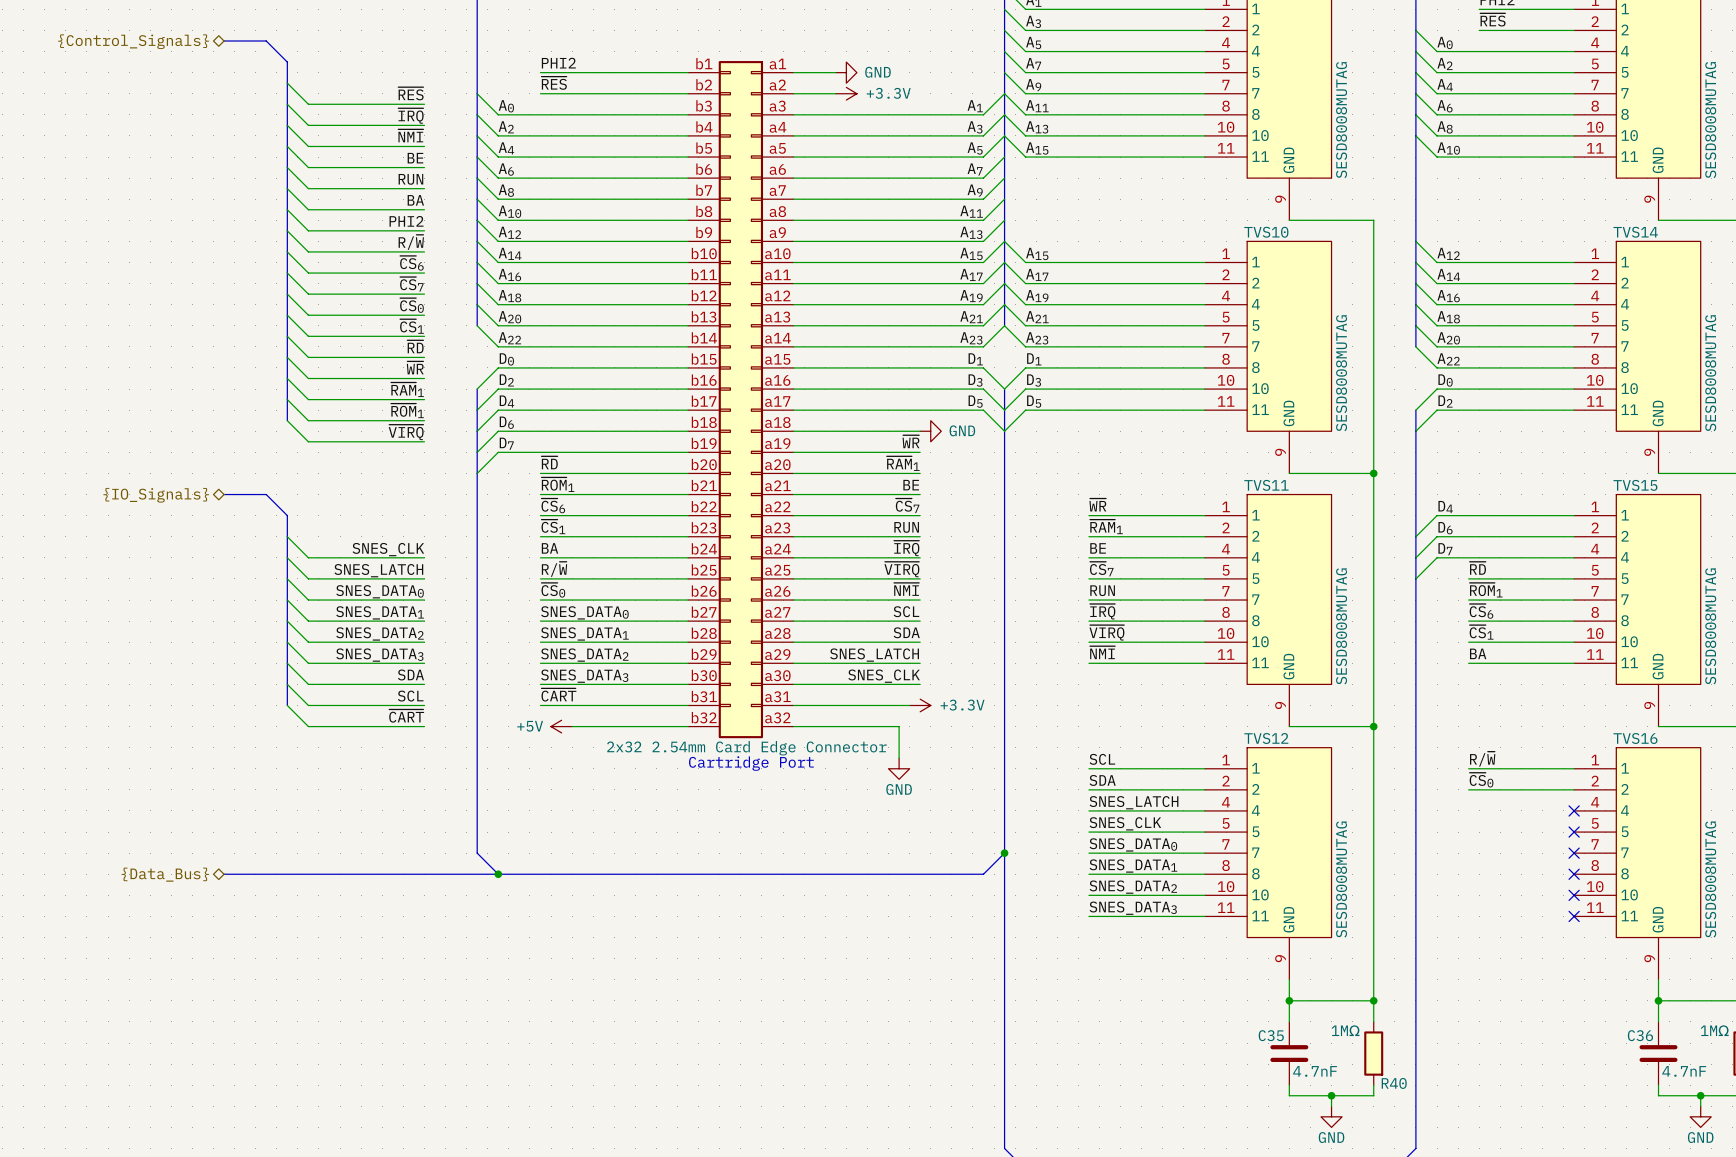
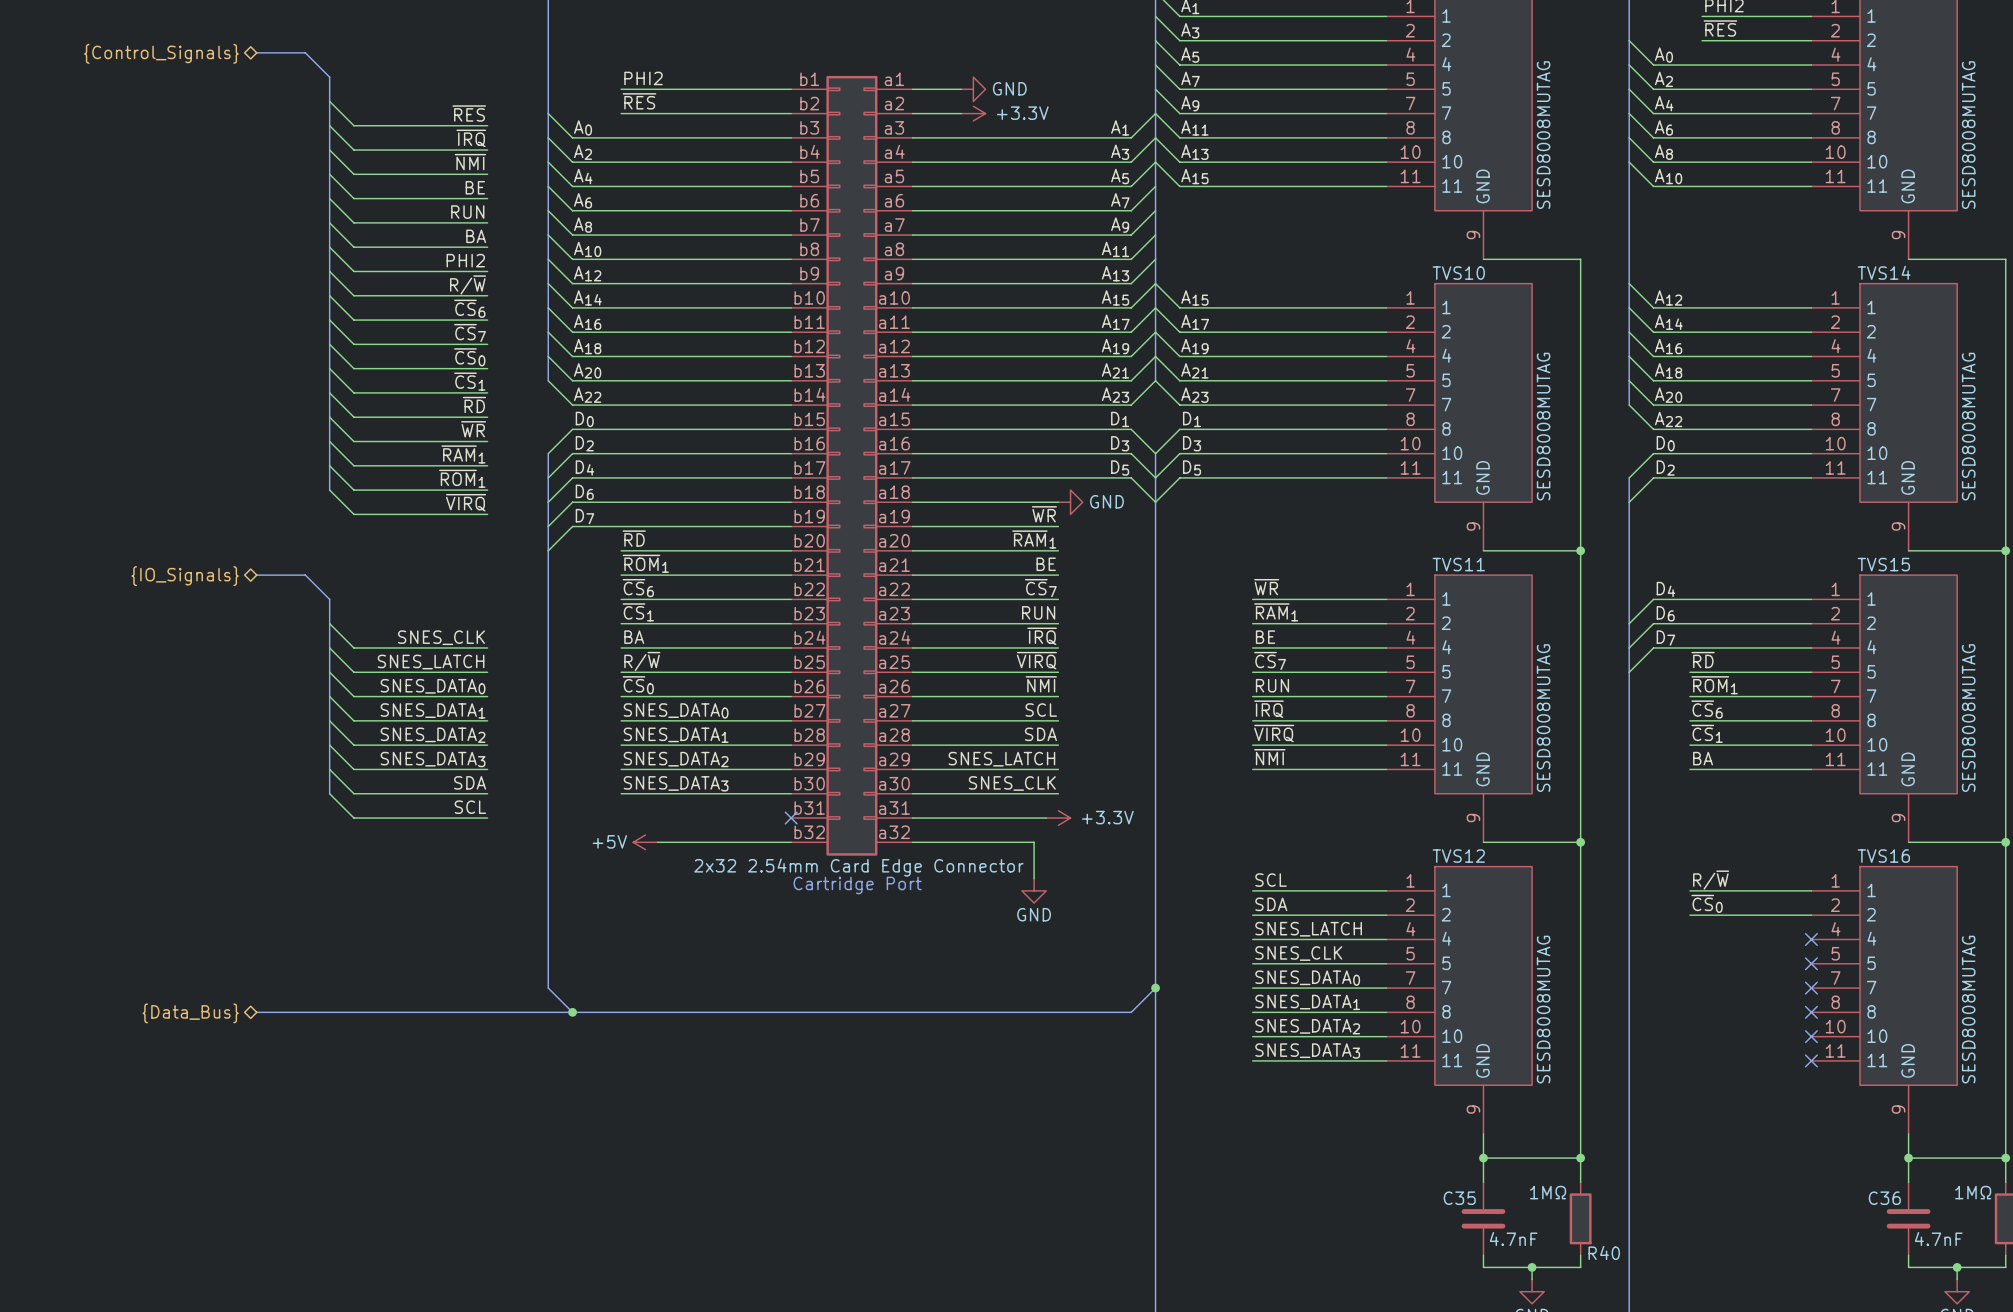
bus: (287, 684) (287, 705) -> none
label: ~{CART} (558, 694) -> none
wire: (287, 705) (308, 726) (424, 726) -> none
wire: (540, 705) (688, 705) -> none
no-connect mark: none -> (791, 818)
label: ~{CART} (406, 716) -> none

